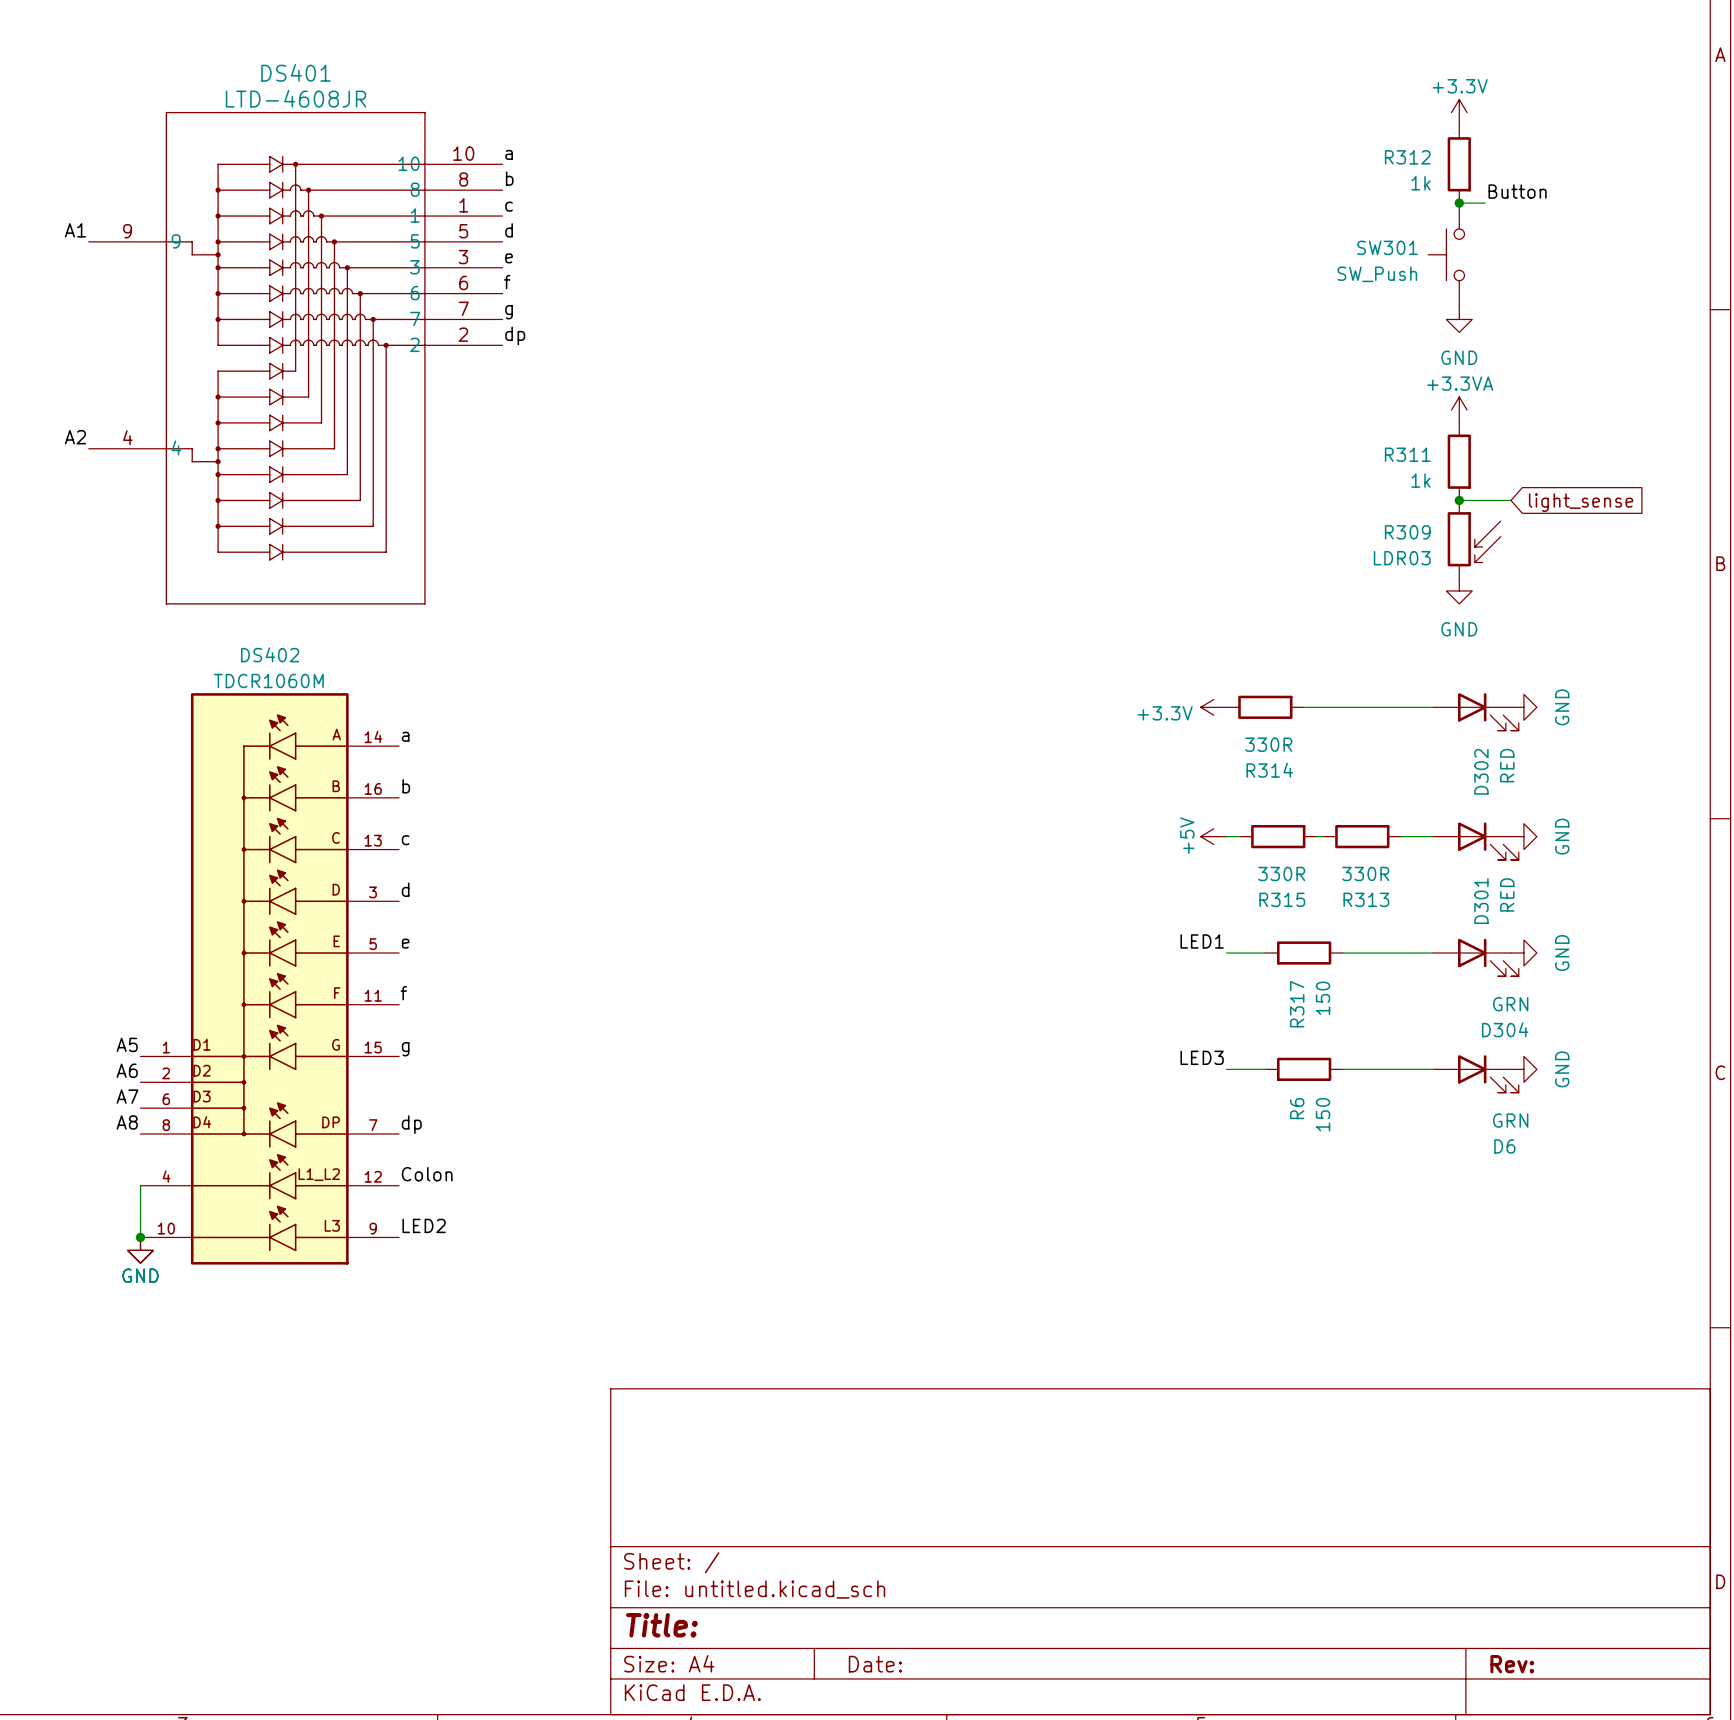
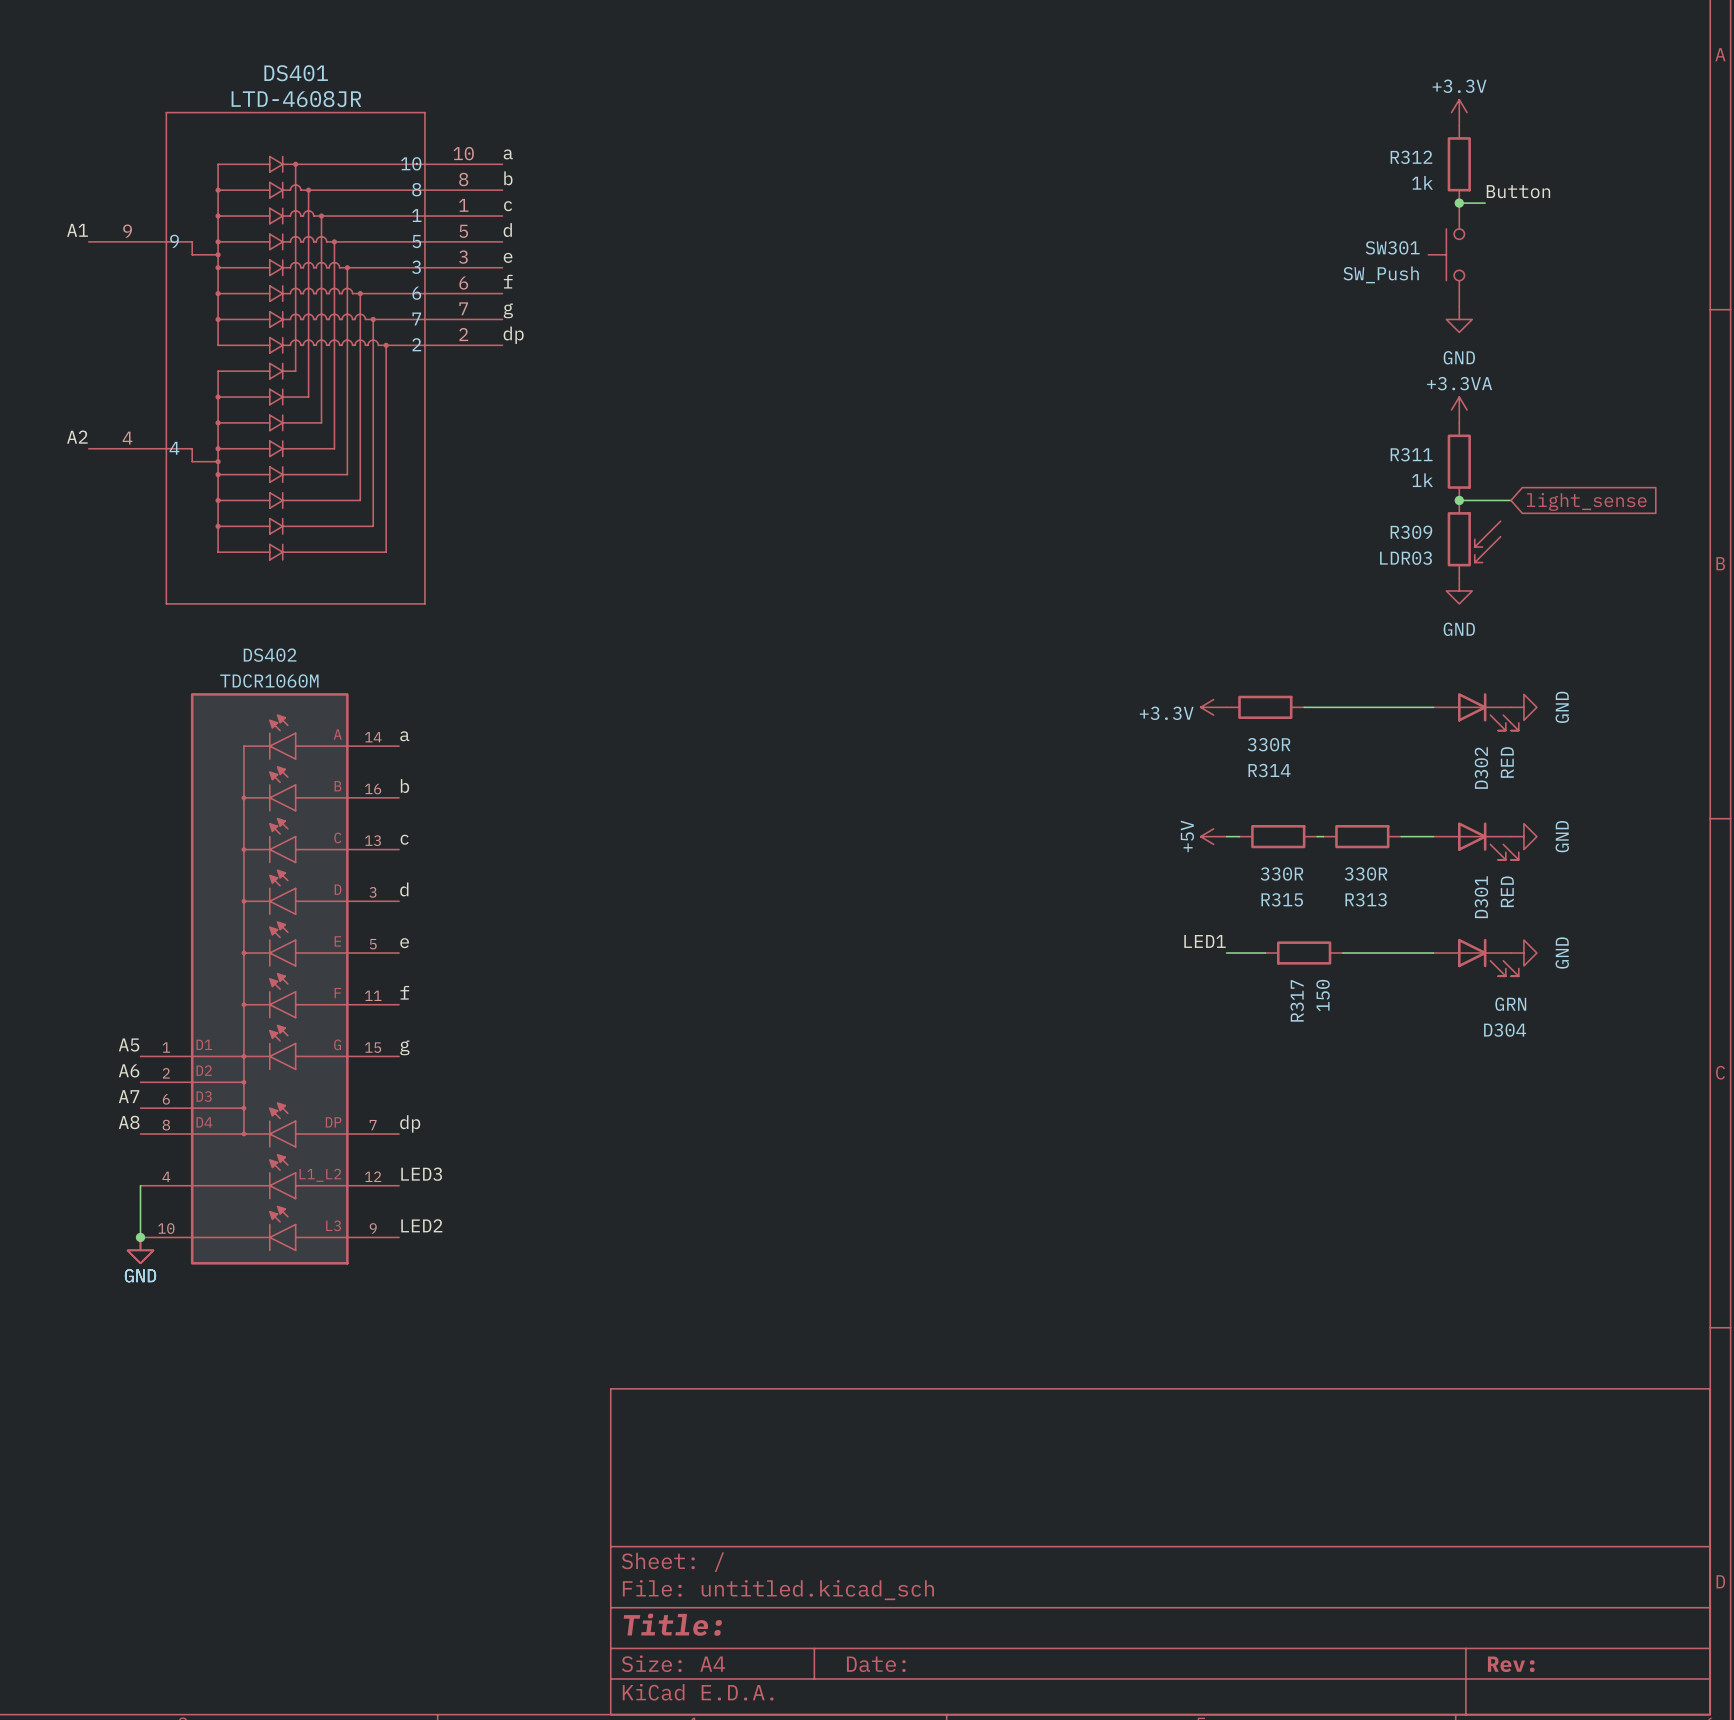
label: LED3 (1202, 1057) -> none
wire: (1226, 1069) (1265, 1069) -> none
R6: 150 (1304, 1069) -> none
wire: (1342, 1069) (1433, 1069) -> none
power symbol: GND (1523, 1069) -> none
D6: GRN (1476, 1073) -> none
label: Colon (427, 1174) -> LED3 (421, 1174)

